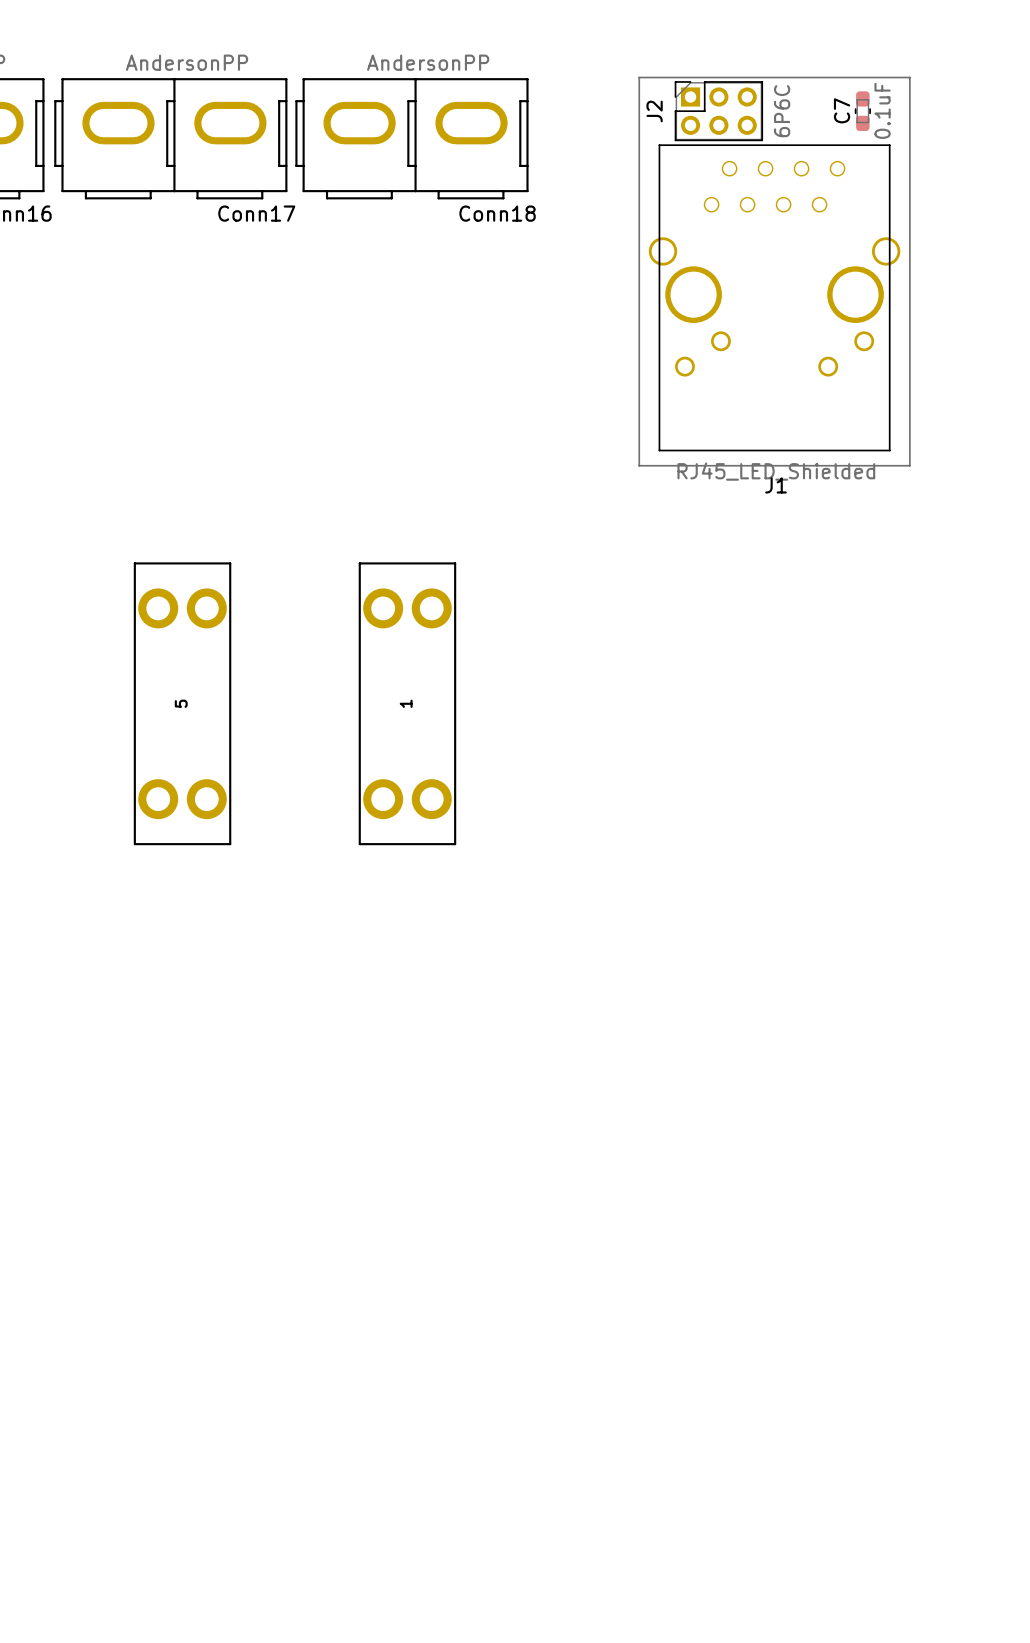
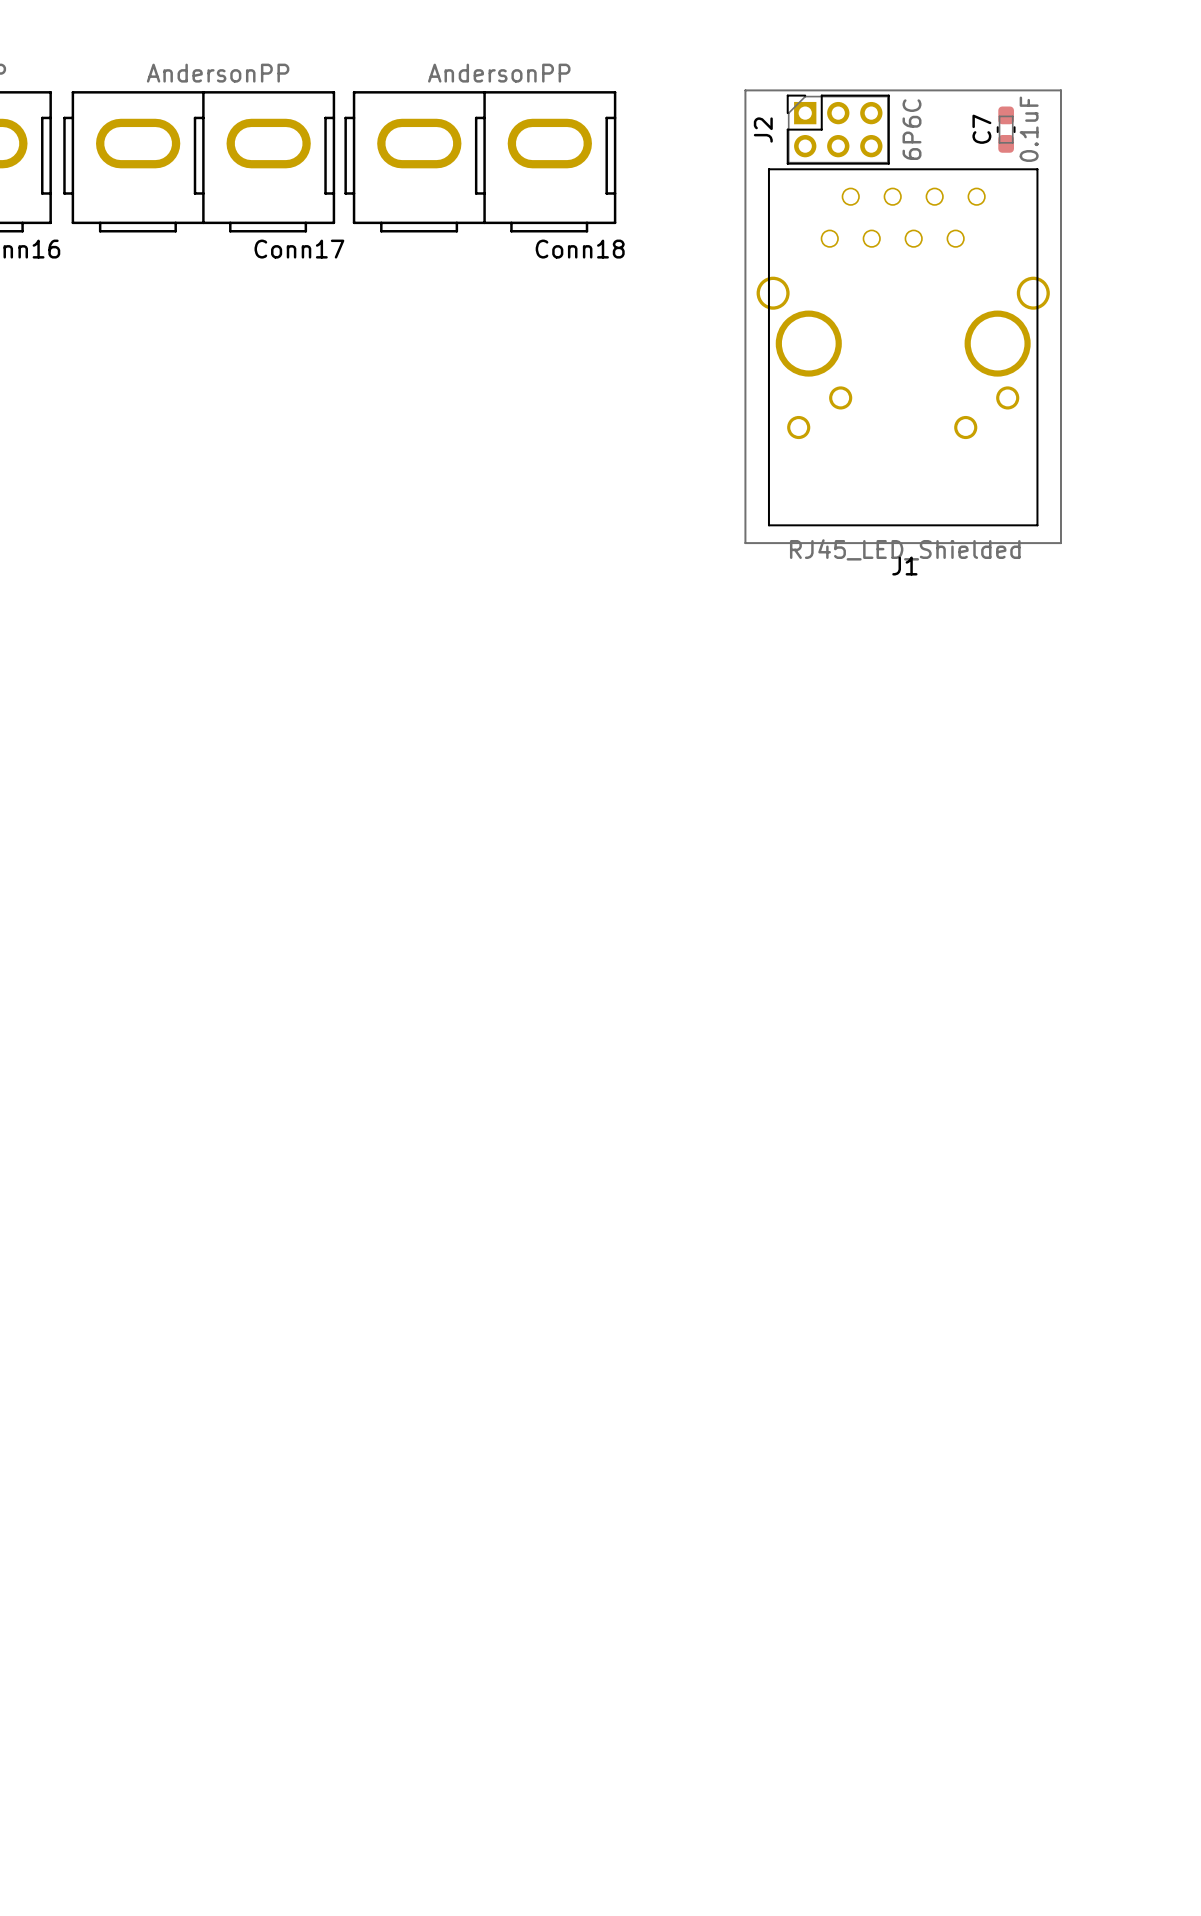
part: 5 (182, 703) -> none
part: 1 (407, 703) -> none

